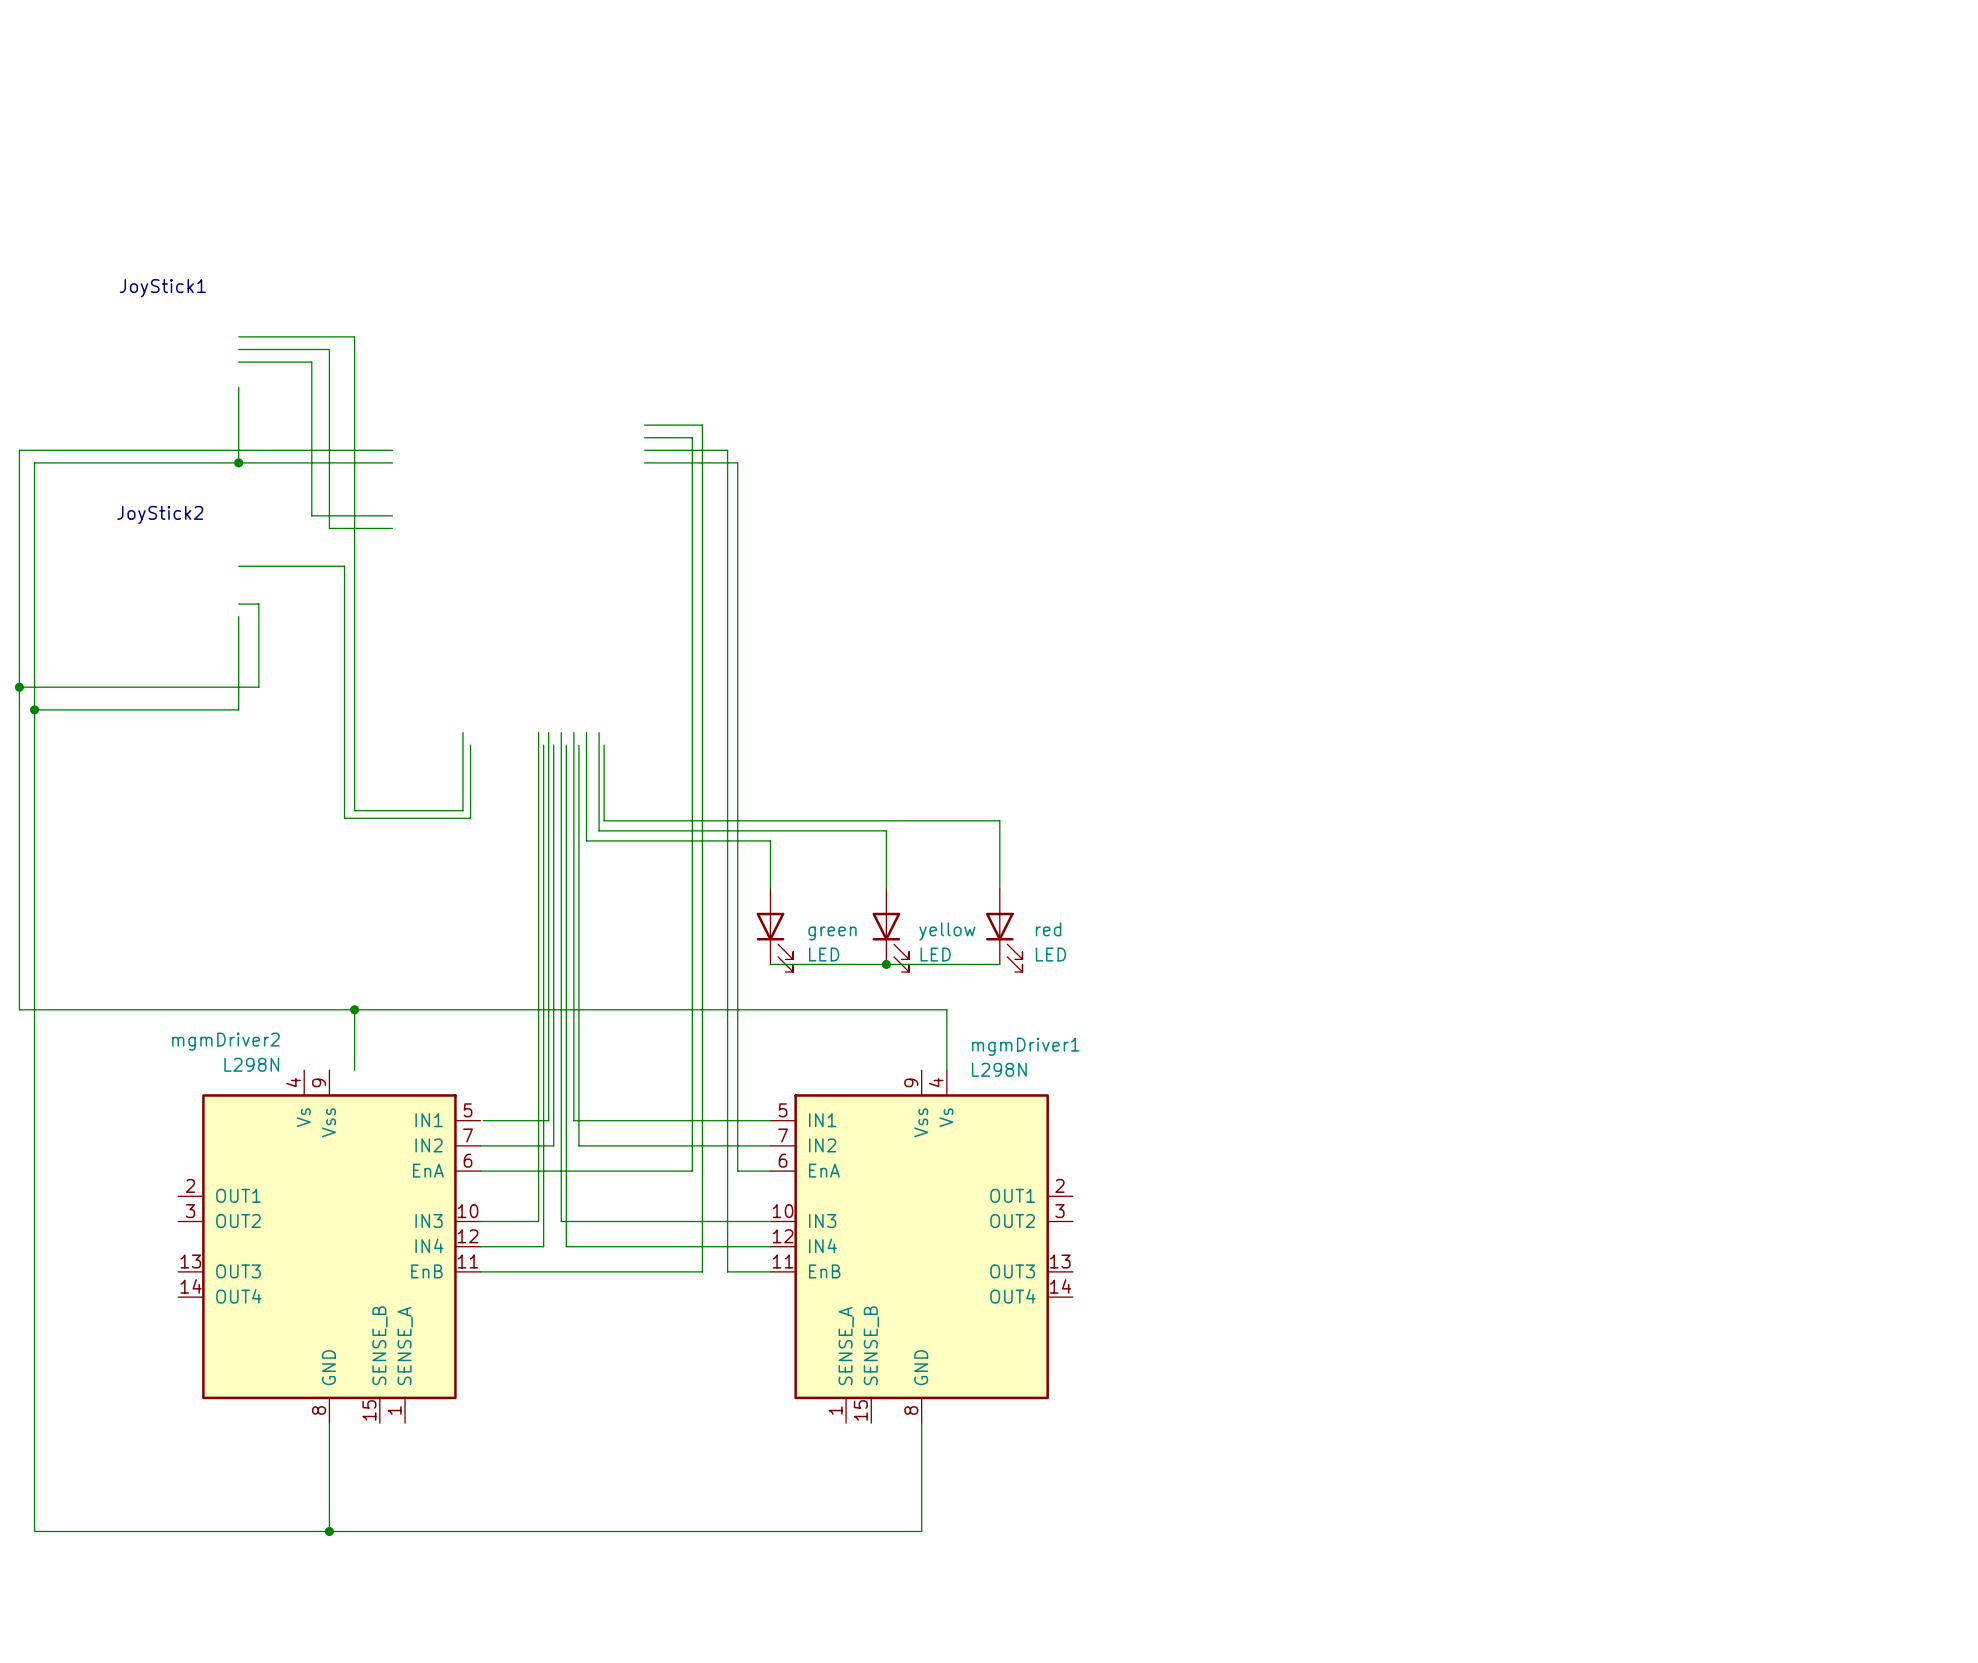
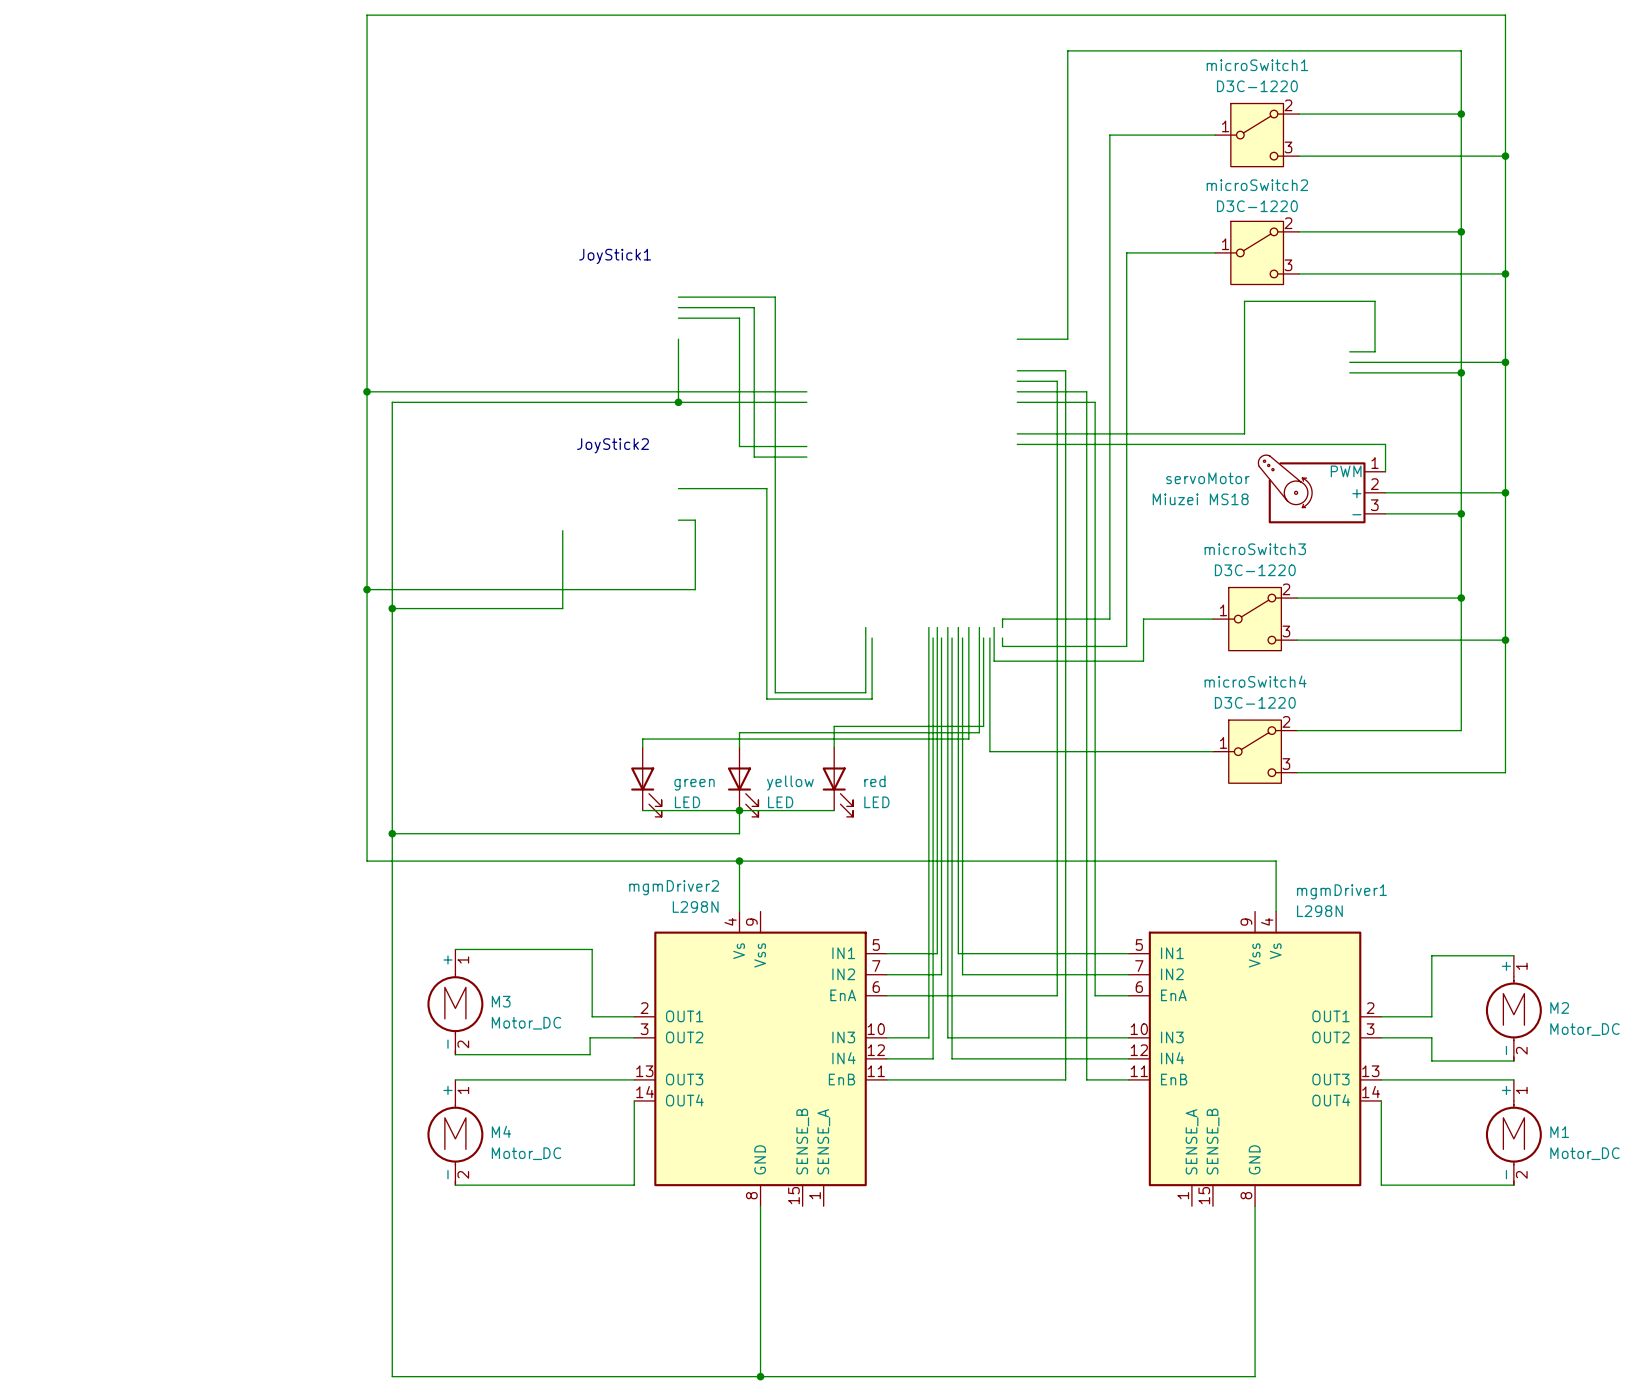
wire: none -> (1299, 114) (1461, 114)
junction: none -> (1461, 114)
wire: none -> (1215, 135) (1109, 135) (1109, 619) (1002, 619) (1002, 627)
microSwitch1: none -> D3C-1220 (1257, 135)
wire: none -> (1299, 156) (1505, 156)
junction: none -> (1505, 156)
wire: none -> (1299, 231) (1461, 231)
junction: none -> (1461, 231)
text: JoyStick1 (162, 288) -> none
wire: none -> (1215, 252) (1126, 252) (1126, 646) (1002, 646) (1002, 638)
microSwitch2: none -> D3C-1220 (1257, 252)
text: none -> JoyStick1 (615, 256)
wire: none -> (1299, 273) (1505, 273)
junction: none -> (1505, 273)
wire: (238, 336) (354, 336) (354, 810) (462, 810) (462, 732) -> none
wire: (238, 349) (329, 349) (329, 528) (392, 528) -> none
wire: none -> (678, 297) (775, 297) (775, 692) (865, 692) (865, 627)
wire: (238, 362) (311, 362) (311, 515) (392, 515) -> none
wire: none -> (678, 307) (754, 307) (754, 457) (806, 457)
wire: none -> (678, 318) (739, 318) (739, 446) (806, 446)
wire: (238, 387) (238, 462) -> none
wire: none -> (678, 339) (678, 402)
wire: none -> (1017, 339) (1067, 339) (1067, 50) (1461, 50) (1461, 730) (1297, 730)
wire: none -> (1349, 351) (1375, 351) (1375, 301) (1244, 301) (1244, 433) (1017, 433)
wire: (644, 425) (702, 425) (702, 1271) (480, 1271) -> none
wire: none -> (1349, 362) (1505, 362)
junction: none -> (1505, 362)
wire: (644, 437) (692, 437) (692, 1171) (480, 1171) -> none
wire: none -> (1017, 370) (1065, 370) (1065, 1079) (886, 1079)
wire: none -> (1349, 372) (1461, 372)
junction: none -> (1461, 372)
wire: (392, 450) (19, 450) (19, 1009) (946, 1009) (946, 1070) -> none
wire: (644, 450) (727, 450) (727, 1271) (770, 1271) -> none
wire: none -> (1017, 381) (1057, 381) (1057, 995) (886, 995)
junction: (238, 462) -> none
wire: (392, 462) (34, 462) (34, 1531) (921, 1531) (921, 1423) -> none
wire: none -> (367, 391) (537, 391)
junction: none -> (367, 391)
wire: (737, 462) (737, 1171) (770, 1171) -> (615, 391) (806, 391)
wire: none -> (1017, 391) (1086, 391) (1086, 1079) (1128, 1079)
junction: none -> (678, 402)
wire: none -> (806, 402) (392, 402) (392, 627)
wire: none -> (1017, 402) (1095, 402) (1095, 995) (1128, 995)
text: JoyStick2 (160, 514) -> none
wire: none -> (1017, 444) (1385, 444) (1385, 471)
text: none -> JoyStick2 (612, 445)
wire: (238, 566) (344, 566) (344, 818) (470, 818) -> (1255, 1206) (1255, 1376) (392, 1376) (392, 688)
wire: none -> (678, 488) (766, 488) (766, 699) (872, 699) (872, 638)
servoMotor: none -> Miuzei MS18 (1321, 489)
wire: none -> (1385, 492) (1505, 492)
junction: none -> (1505, 492)
wire: (238, 604) (258, 604) (258, 687) (19, 687) -> none
wire: none -> (1385, 513) (1461, 513)
junction: none -> (1461, 513)
wire: (238, 616) (238, 709) (34, 709) -> none
wire: none -> (678, 520) (695, 520) (695, 589) (367, 589)
wire: none -> (562, 530) (562, 608) (392, 608)
junction: (19, 687) -> none
junction: none -> (367, 589)
junction: (34, 709) -> none
wire: none -> (1297, 598) (1461, 598)
junction: none -> (1461, 598)
junction: none -> (392, 608)
wire: (538, 732) (538, 1221) (480, 1221) -> none
wire: (548, 732) (548, 1120) (483, 1120) -> none
wire: (561, 732) (561, 1221) (770, 1221) -> none
wire: (573, 732) (573, 1120) (770, 1120) -> none
wire: (586, 732) (586, 840) (770, 840) (770, 878) -> (968, 627) (968, 739) (642, 739)
wire: (599, 732) (599, 830) (886, 830) (886, 871) -> (979, 627) (979, 732) (739, 732)
wire: none -> (1212, 619) (1143, 619) (1143, 661) (994, 661) (994, 627)
microSwitch3: none -> D3C-1220 (1255, 619)
wire: (543, 745) (543, 1246) (480, 1246) -> none
wire: (553, 745) (553, 1145) (480, 1145) -> none
wire: (566, 745) (566, 1246) (770, 1246) -> none
wire: (578, 745) (578, 1145) (770, 1145) -> none
wire: (604, 745) (604, 820) (999, 820) (999, 863) -> (983, 638) (983, 726) (834, 726)
wire: none -> (928, 627) (928, 1037) (886, 1037)
wire: none -> (937, 627) (937, 953) (886, 953)
wire: none -> (947, 627) (947, 1037) (1128, 1037)
wire: none -> (958, 627) (958, 953) (1128, 953)
wire: none -> (933, 638) (933, 1058) (886, 1058)
wire: none -> (941, 638) (941, 974) (886, 974)
wire: none -> (952, 638) (952, 1058) (1128, 1058)
wire: none -> (962, 638) (962, 974) (1128, 974)
wire: none -> (989, 638) (989, 751) (1212, 751)
wire: none -> (1297, 640) (1505, 640)
junction: none -> (1505, 640)
microSwitch4: none -> D3C-1220 (1255, 751)
wire: none -> (1297, 772) (1505, 772) (1505, 15) (367, 15) (367, 861) (1276, 861) (1276, 911)
wire: none -> (739, 810) (739, 833) (392, 833)
junction: none -> (392, 833)
wire: (354, 1009) (354, 1070) -> none
junction: (354, 1009) -> none
wire: none -> (739, 861) (739, 911)
junction: none -> (739, 861)
wire: none -> (455, 949) (592, 949) (592, 1016) (634, 1016)
wire: none -> (1513, 955) (1431, 955) (1431, 1016) (1381, 1016)
M3: none -> Motor_DC (455, 1002)
M2: none -> Motor_DC (1513, 1008)
wire: none -> (634, 1037) (590, 1037) (590, 1054) (455, 1054)
wire: none -> (1381, 1037) (1431, 1037) (1431, 1060) (1513, 1060)
mgmDriver2 position: (329, 1246) -> (760, 1058)
mgmDriver1 position: (921, 1246) -> (1255, 1058)
wire: none -> (455, 1079) (634, 1079)
wire: none -> (1381, 1079) (1513, 1079)
wire: none -> (634, 1100) (634, 1185) (455, 1185)
wire: none -> (1381, 1100) (1381, 1185) (1513, 1185)
M4: none -> Motor_DC (455, 1132)
M1: none -> Motor_DC (1513, 1132)
wire: (329, 1423) (329, 1531) -> none
wire: none -> (760, 1206) (760, 1376)
junction: (329, 1531) -> none
junction: none -> (760, 1376)

